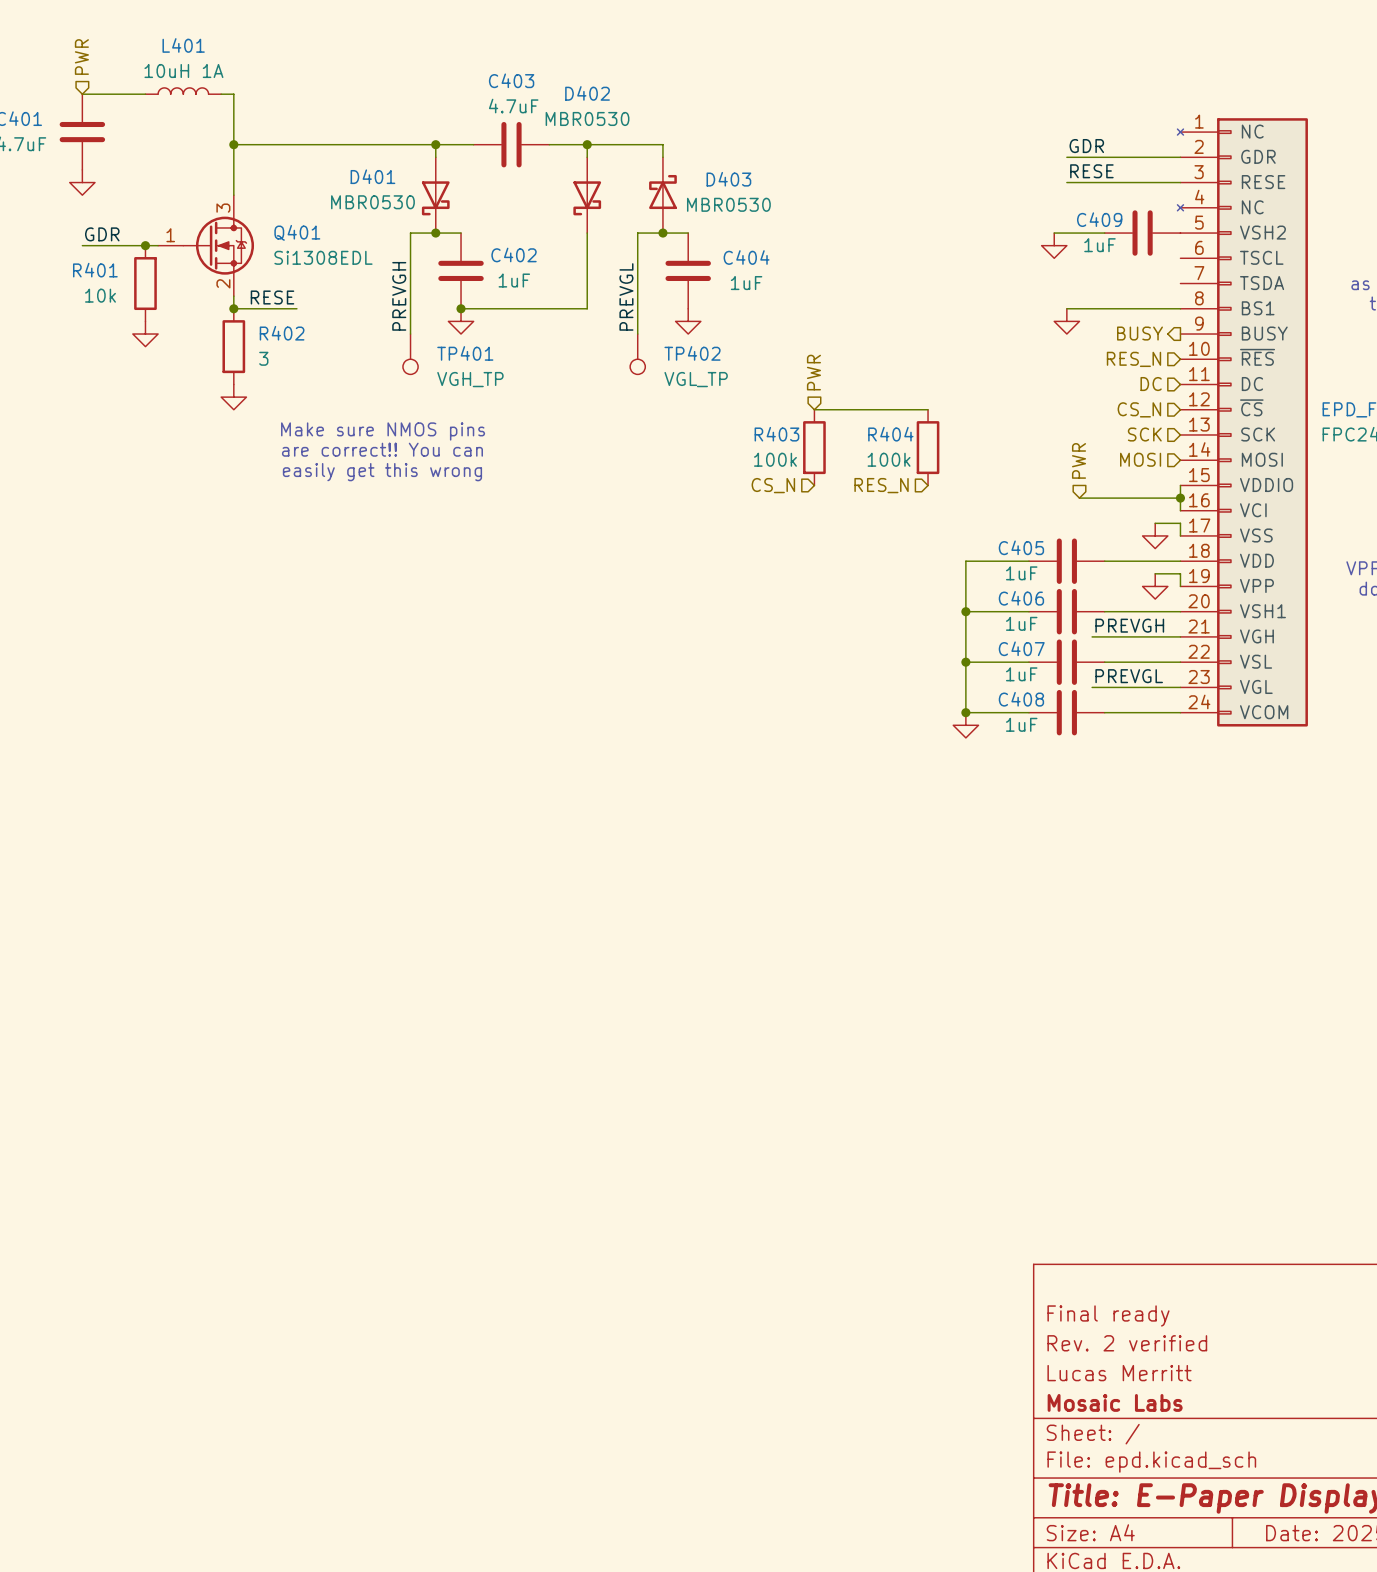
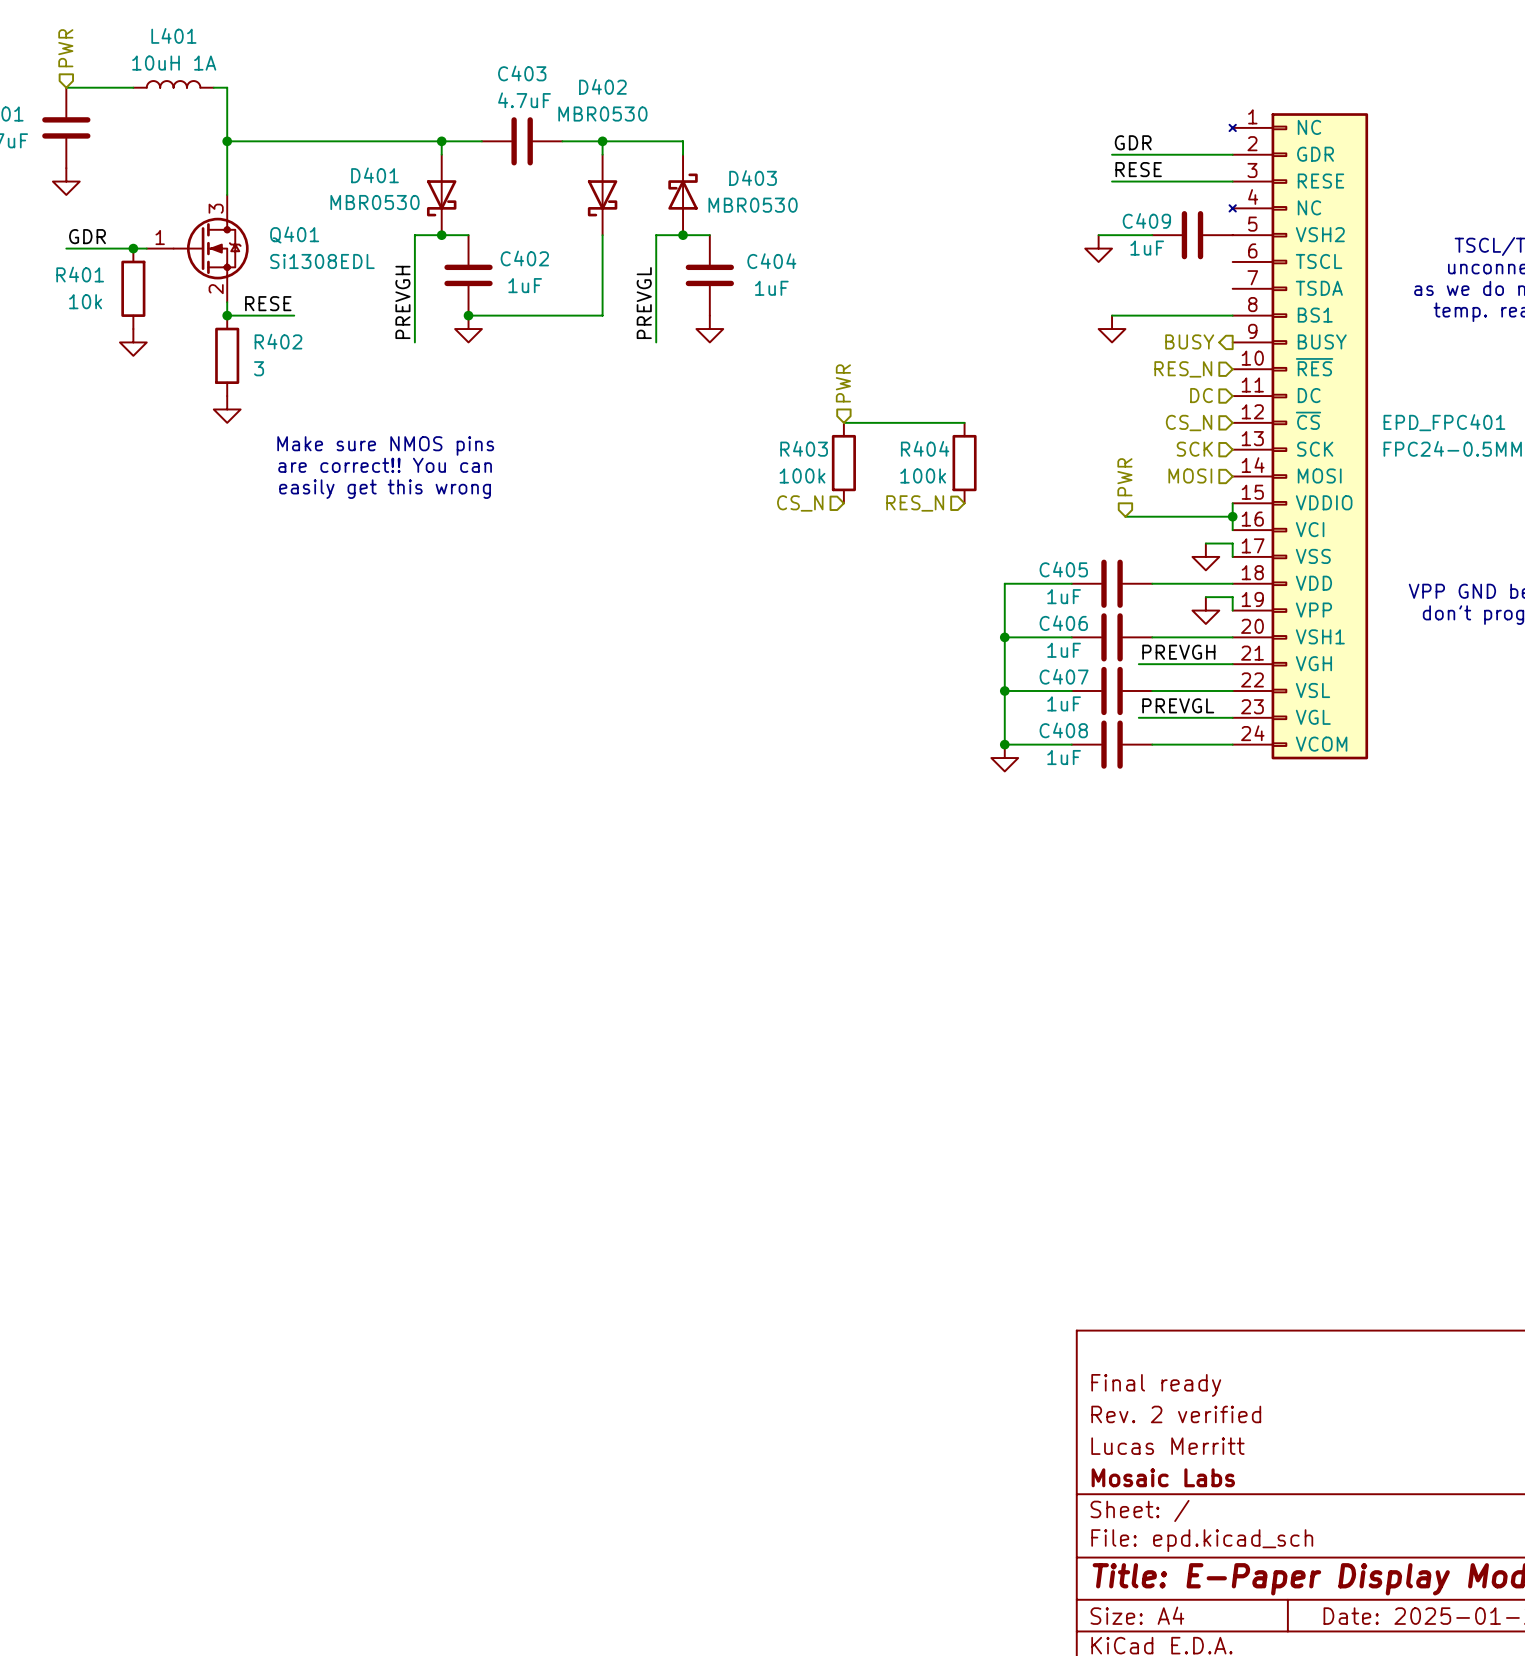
TP401: VGH_TP (410, 354) -> none
TP402: VGL_TP (637, 354) -> none

